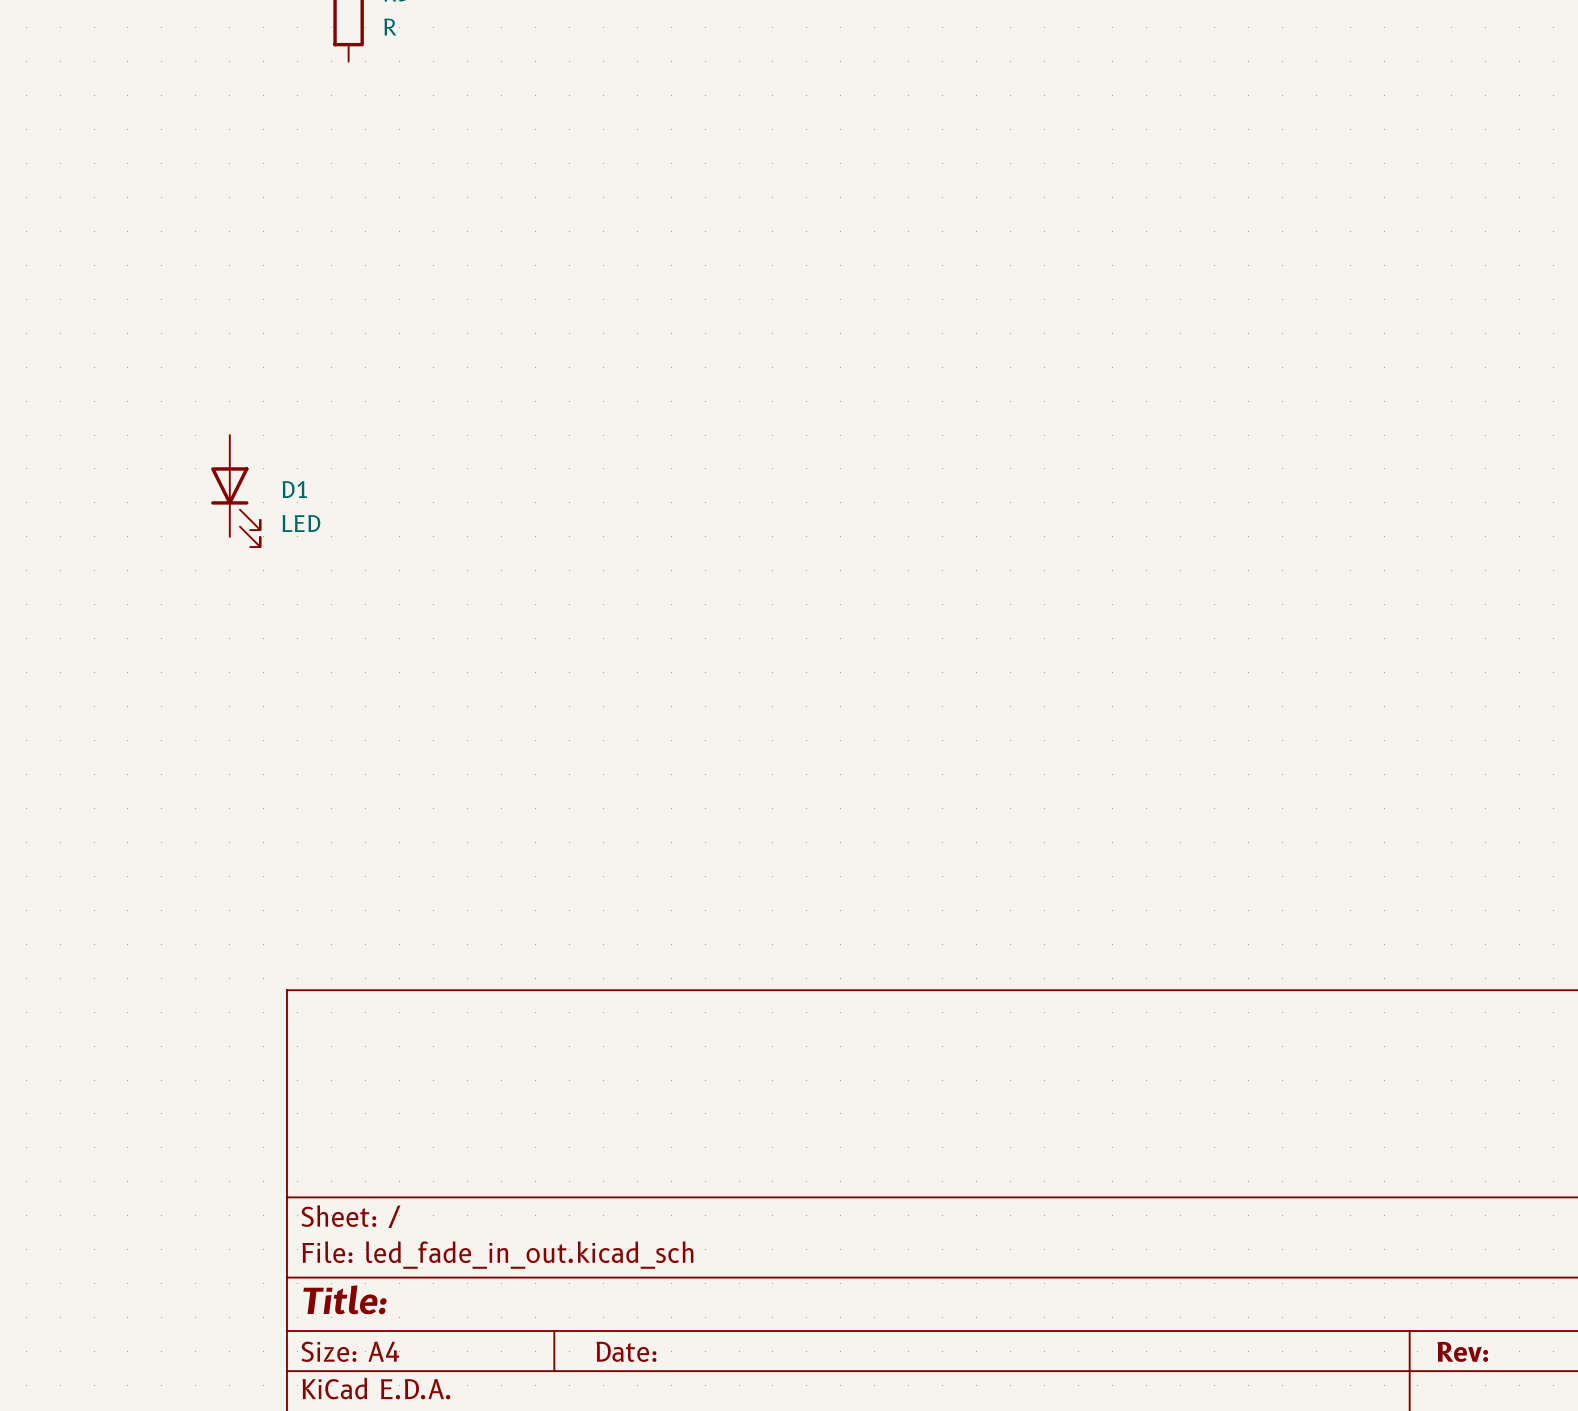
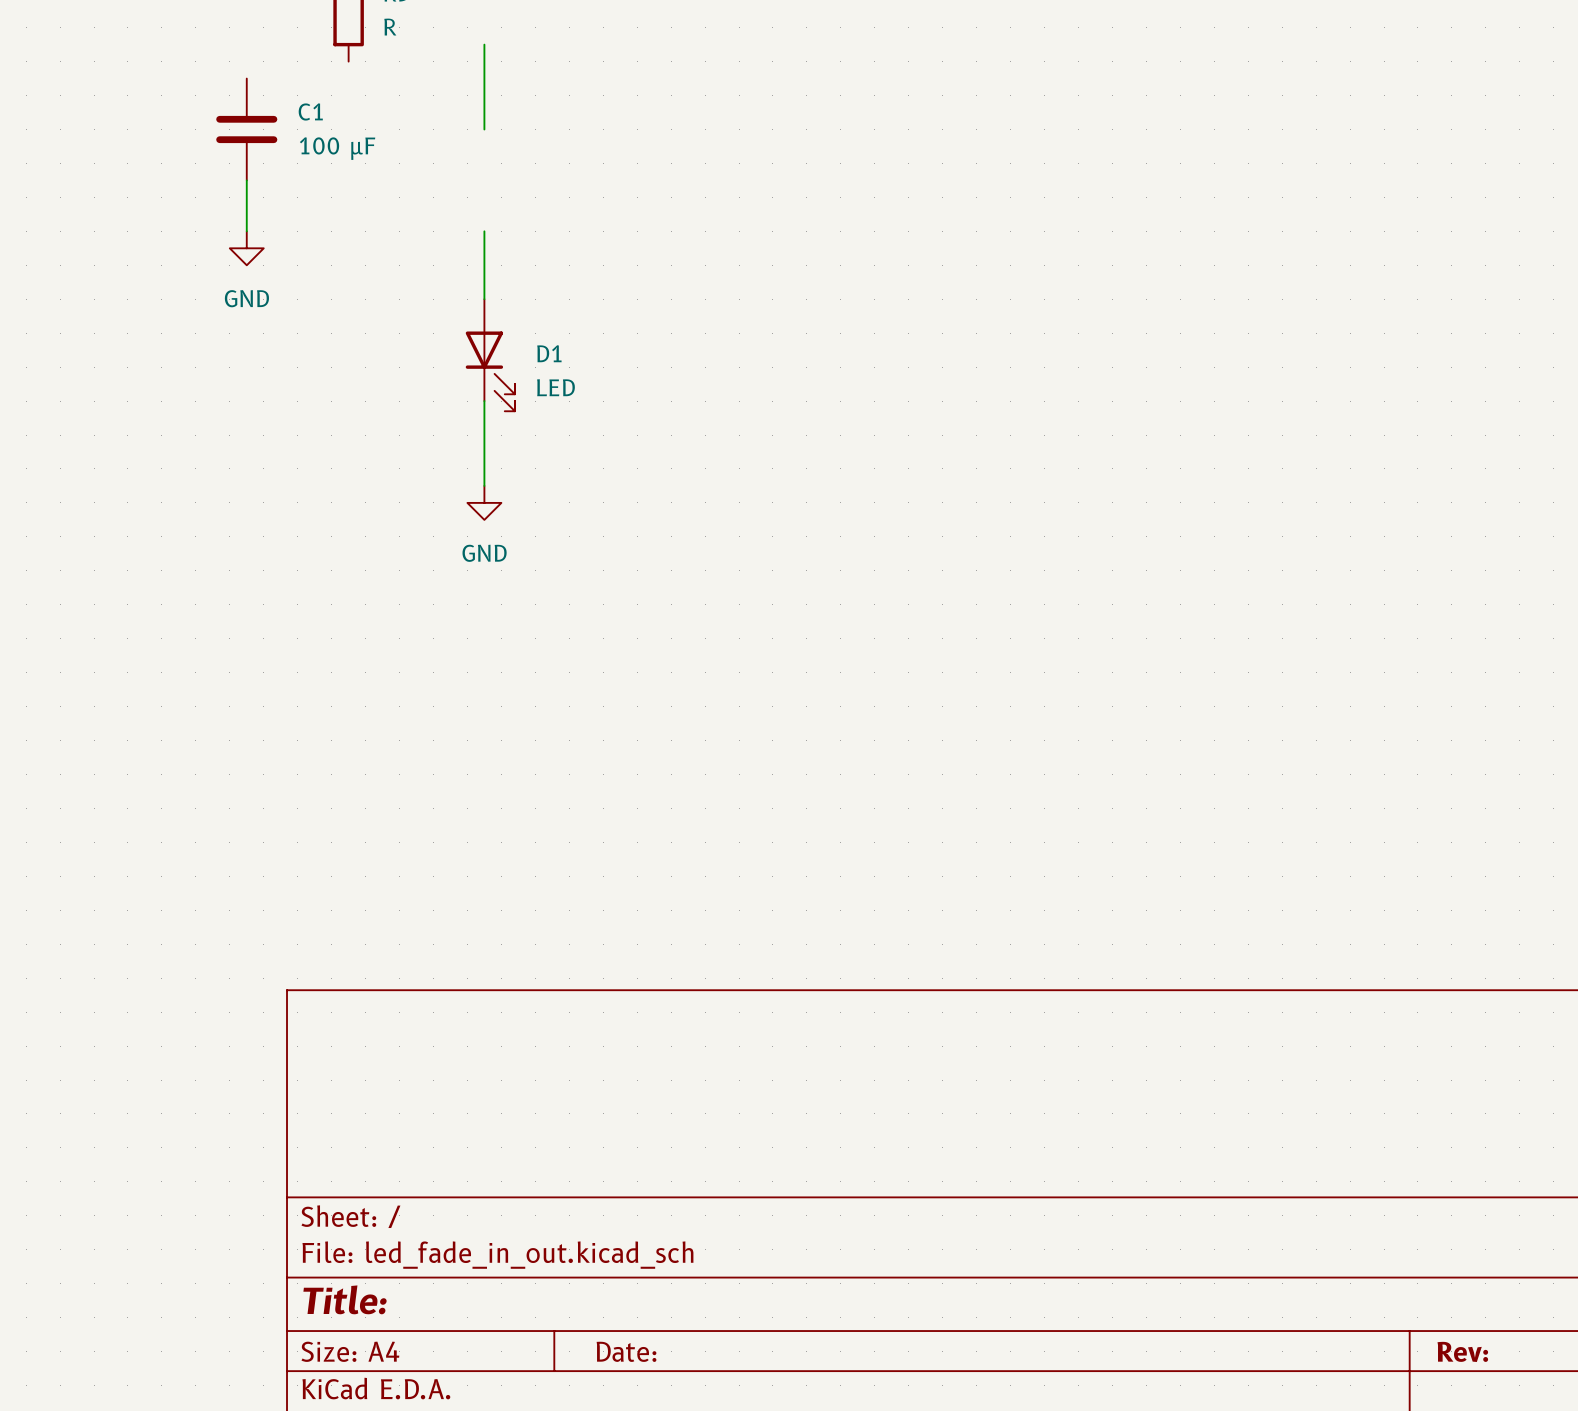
wire: none -> (484, 44) (484, 129)
C1: none -> 100 µF (246, 129)
wire: none -> (246, 180) (246, 231)
wire: none -> (484, 231) (484, 299)
power symbol: none -> GND (246, 248)
wire: none -> (484, 401) (484, 485)
D1 position: (235, 491) -> (490, 355)
power symbol: none -> GND (484, 502)

